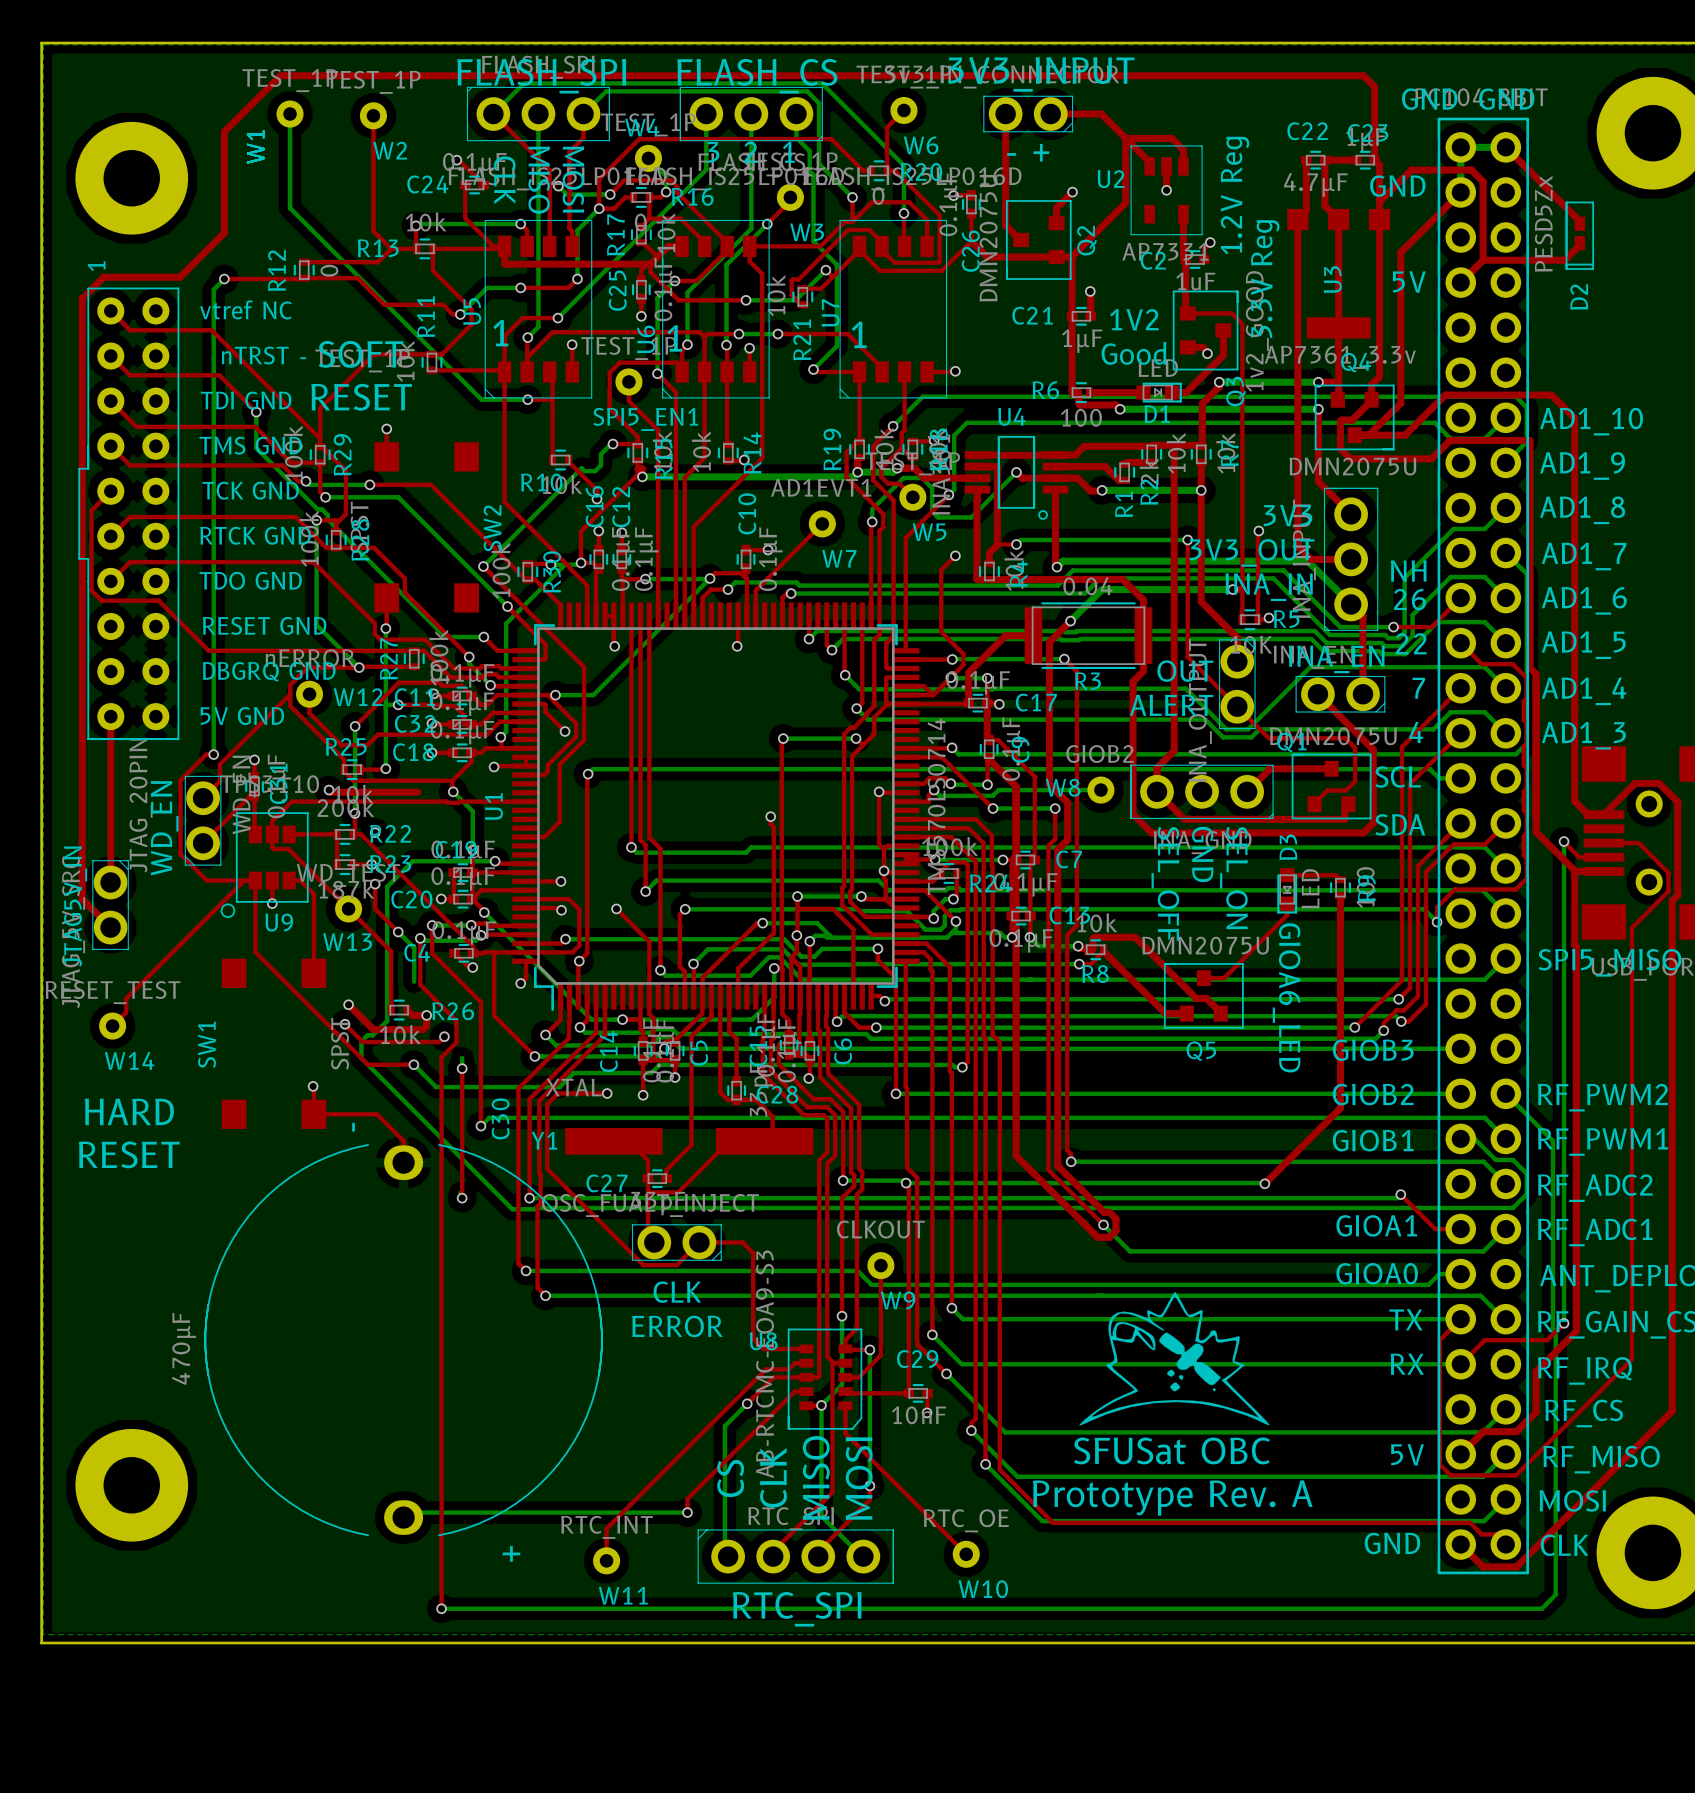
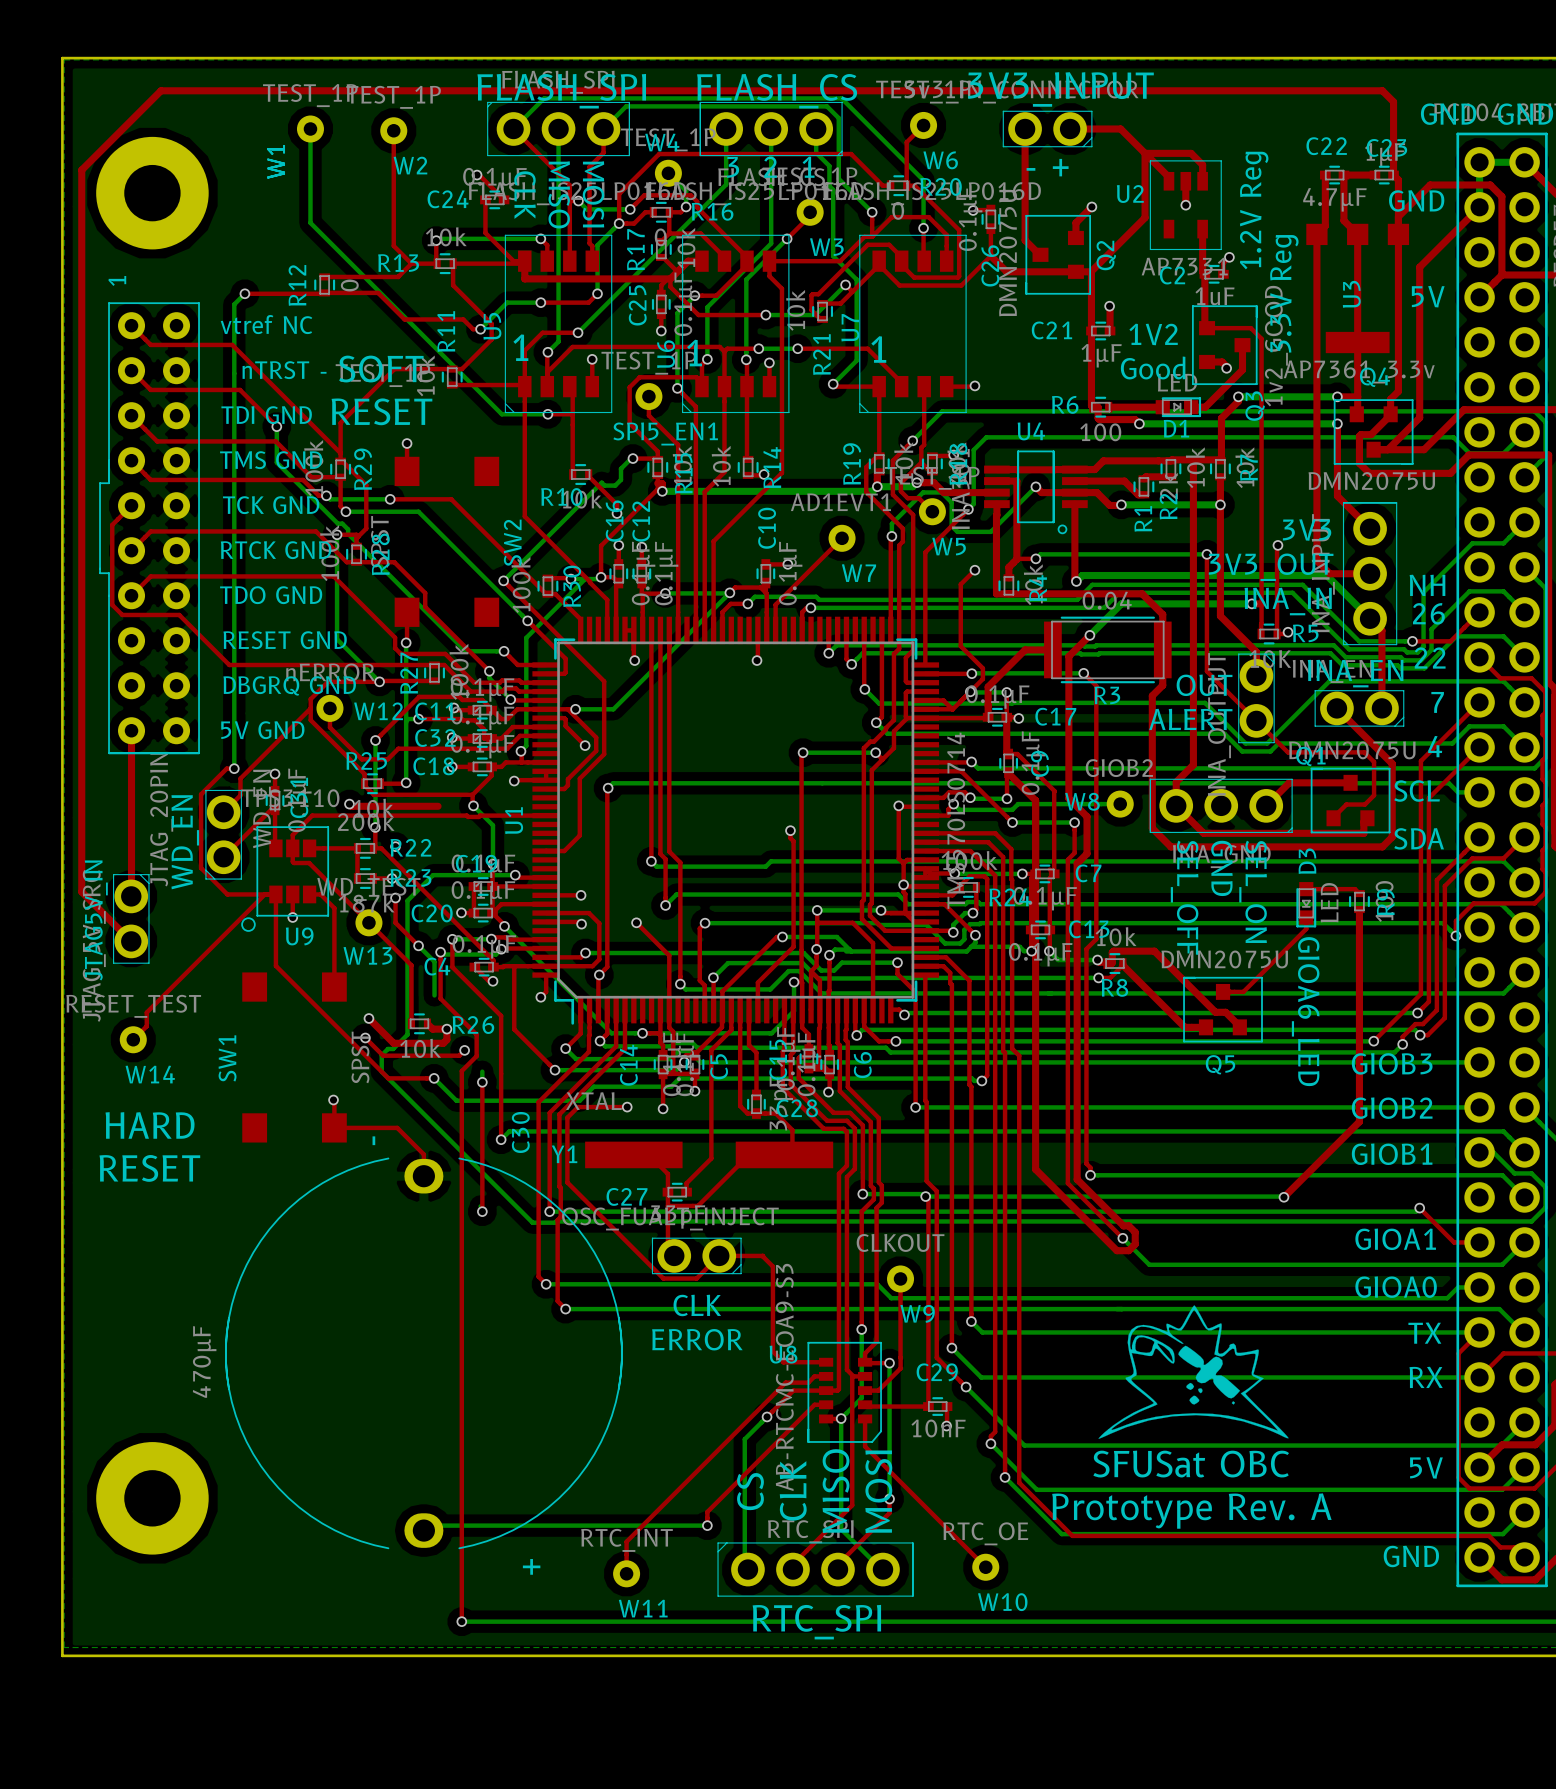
top track: (280, 75) (224, 131) (224, 232) (180, 277) (103, 277) (82, 298) (82, 899) -> (300, 90) (161, 90) (81, 170) (81, 891) (102, 913)

